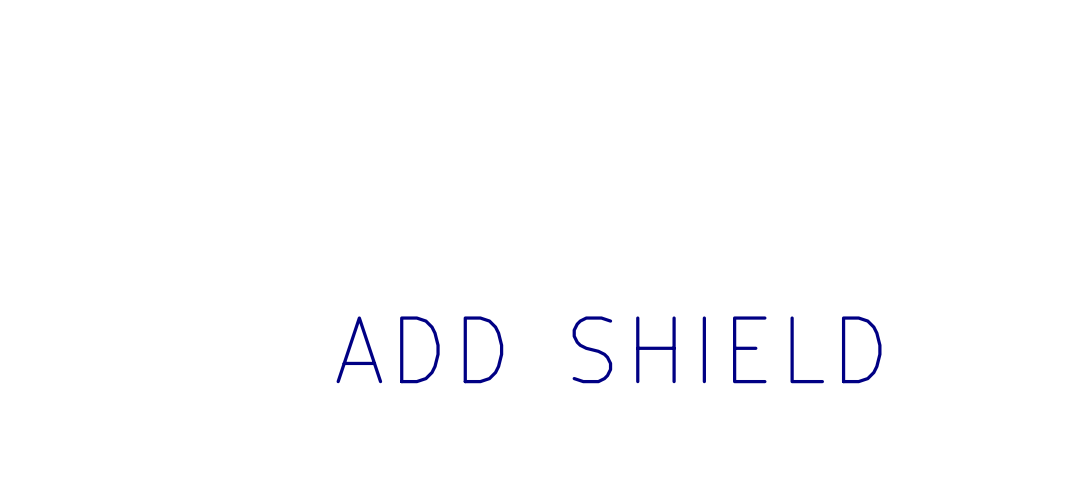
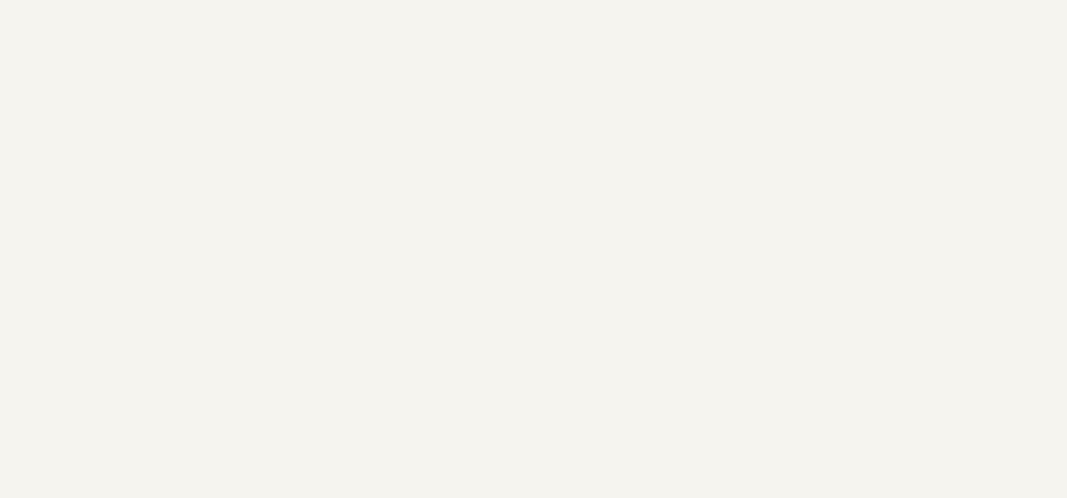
text: ADD SHIELD (609, 349) -> none

